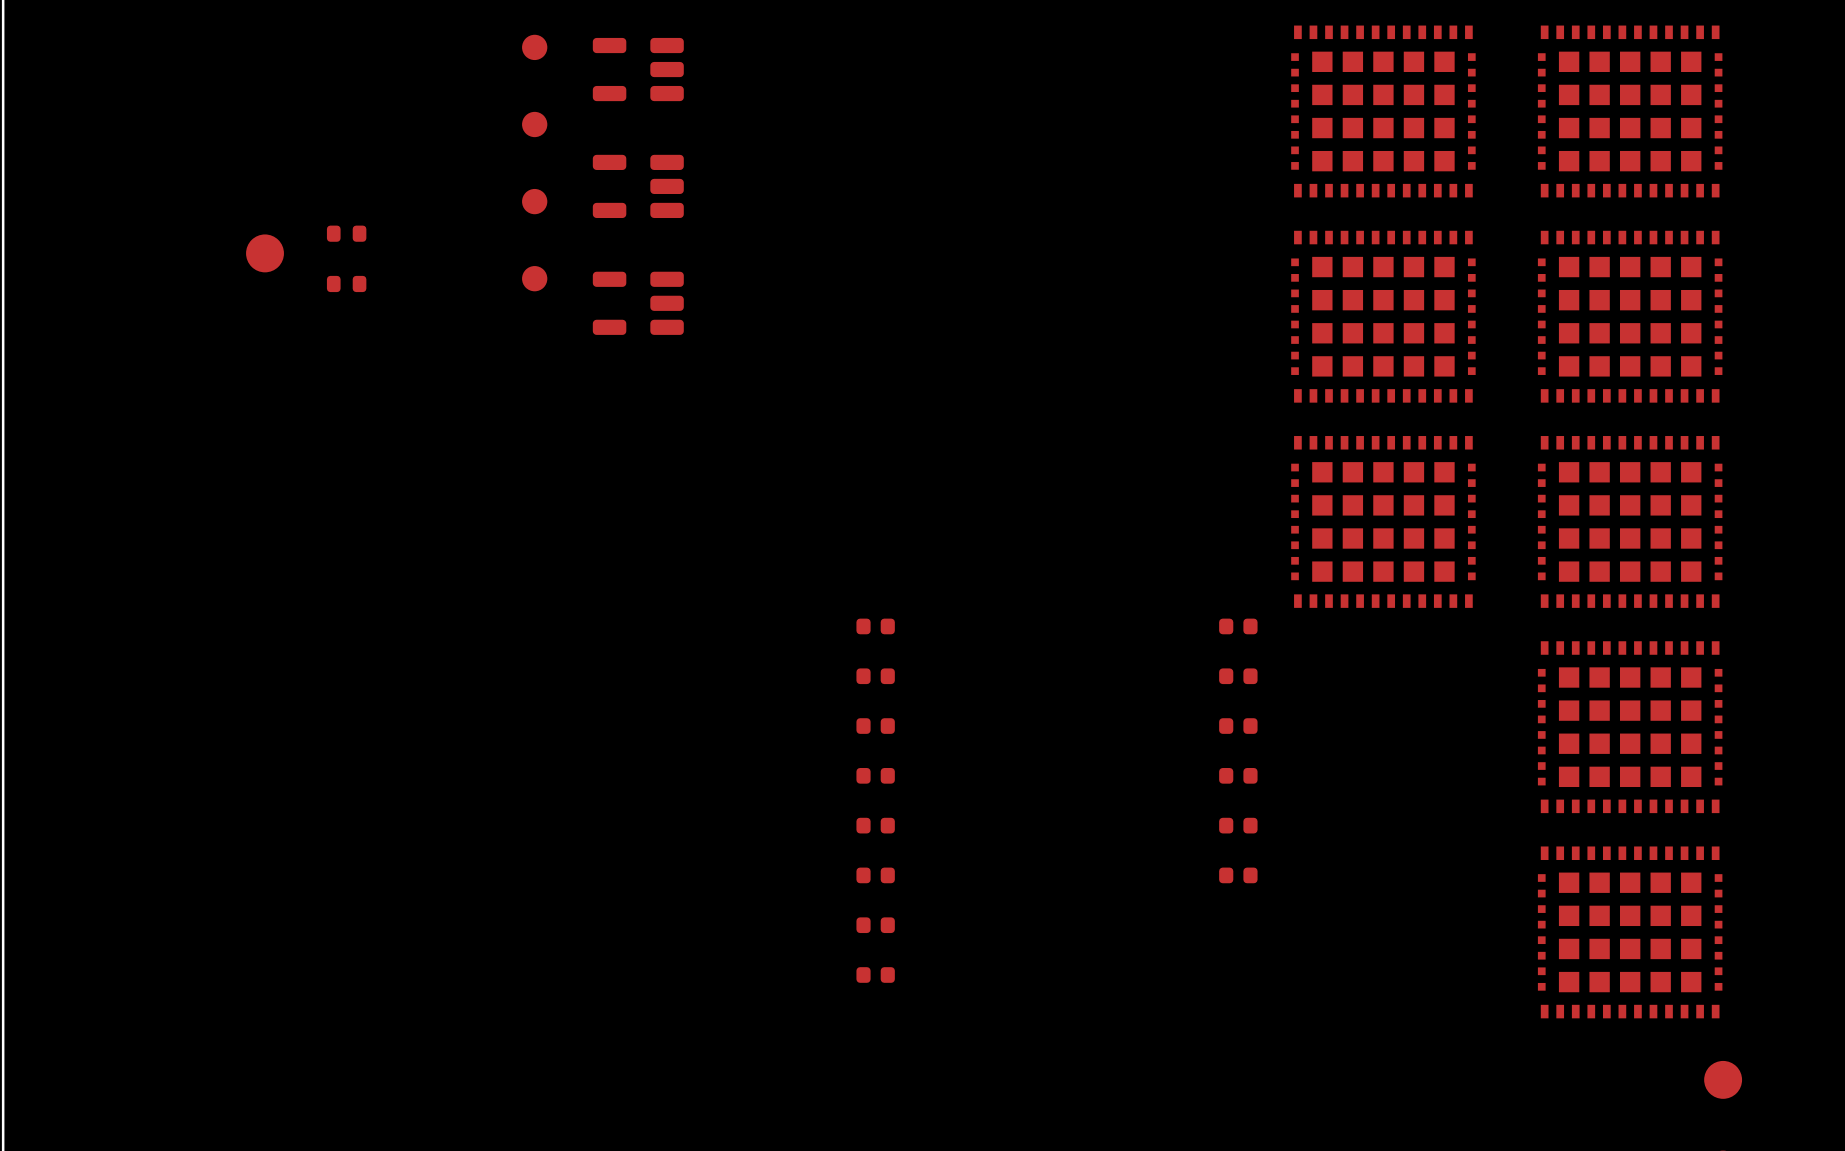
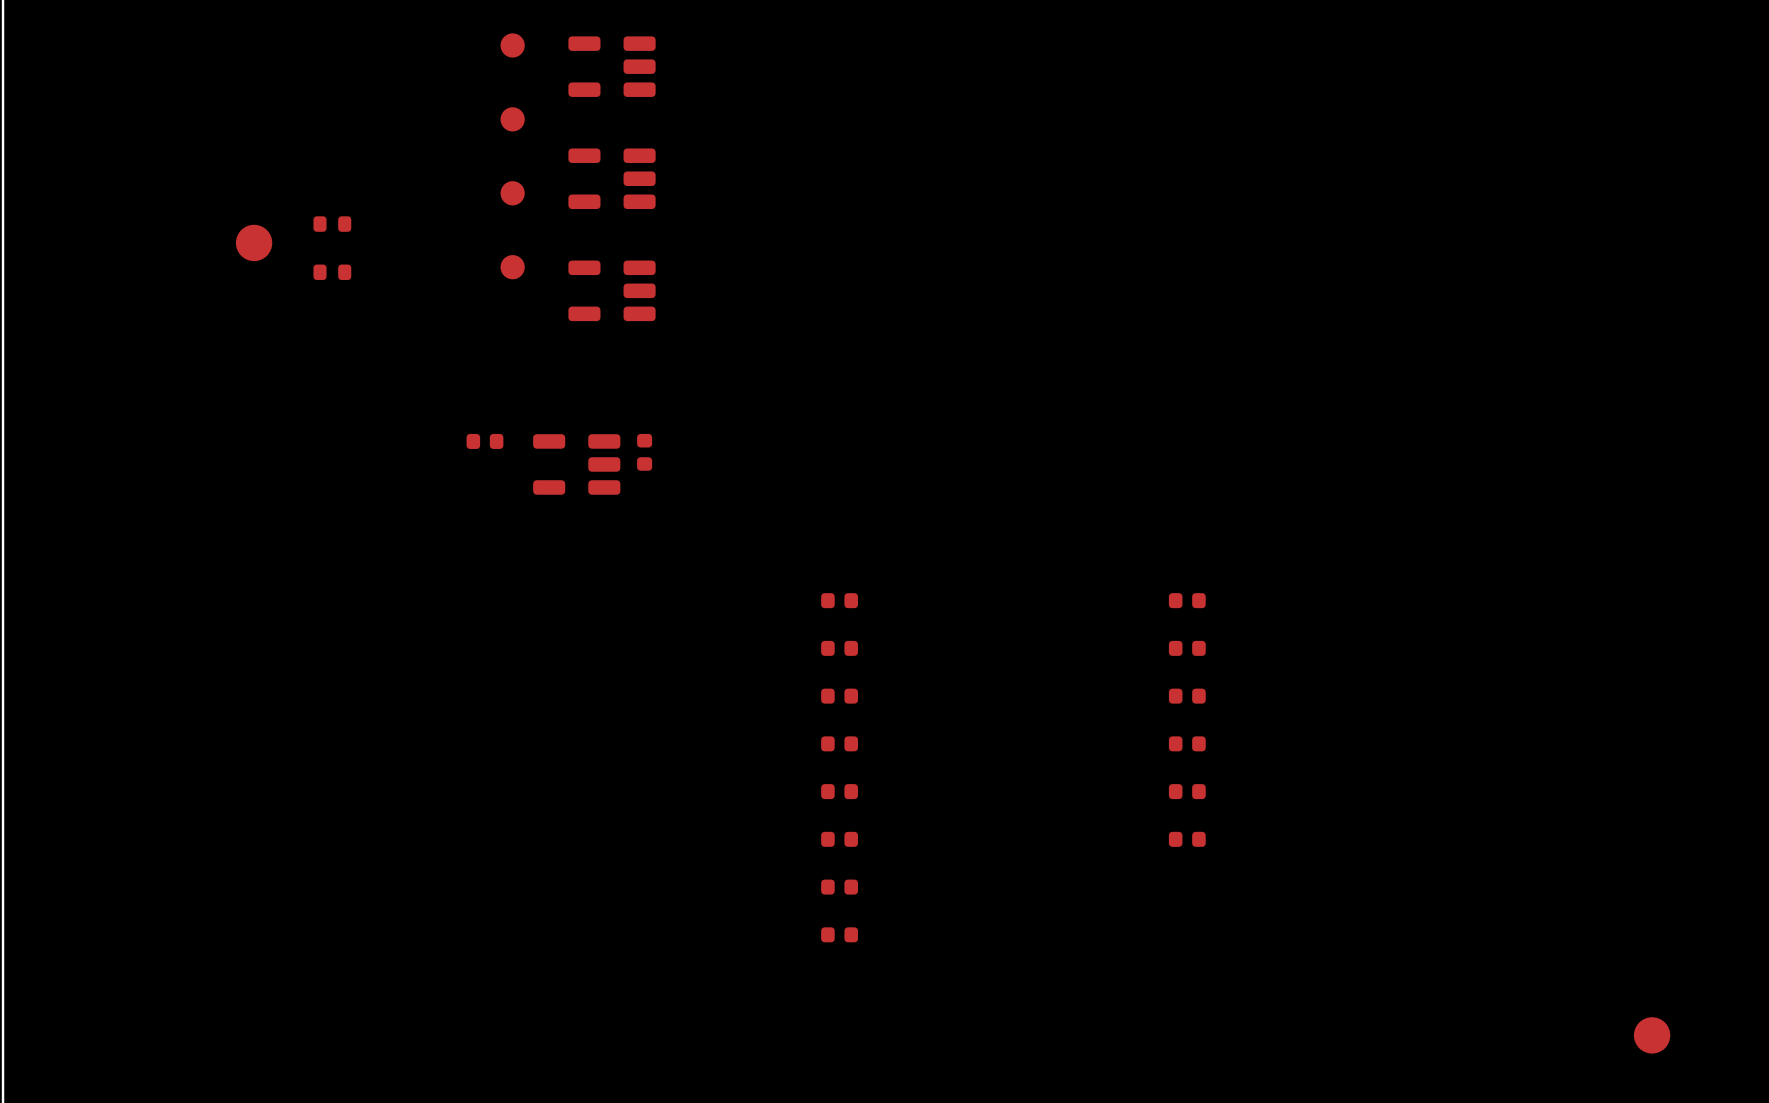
part: (1383, 111) -> none
part: (1630, 111) -> none
part: (1383, 316) -> none
part: (1630, 316) -> none
part: none -> (484, 441)
part: none -> (644, 452)
part: none -> (576, 464)
part: (1383, 521) -> none
part: (1630, 521) -> none
part: (1630, 727) -> none
part: (1630, 932) -> none

